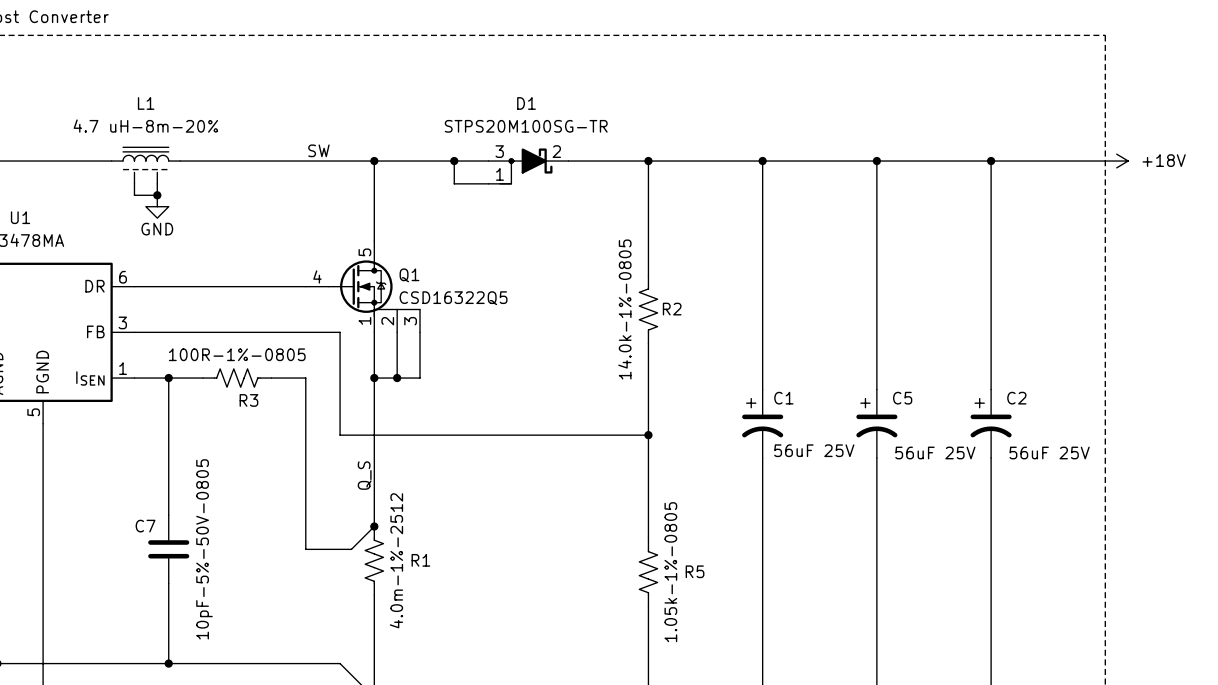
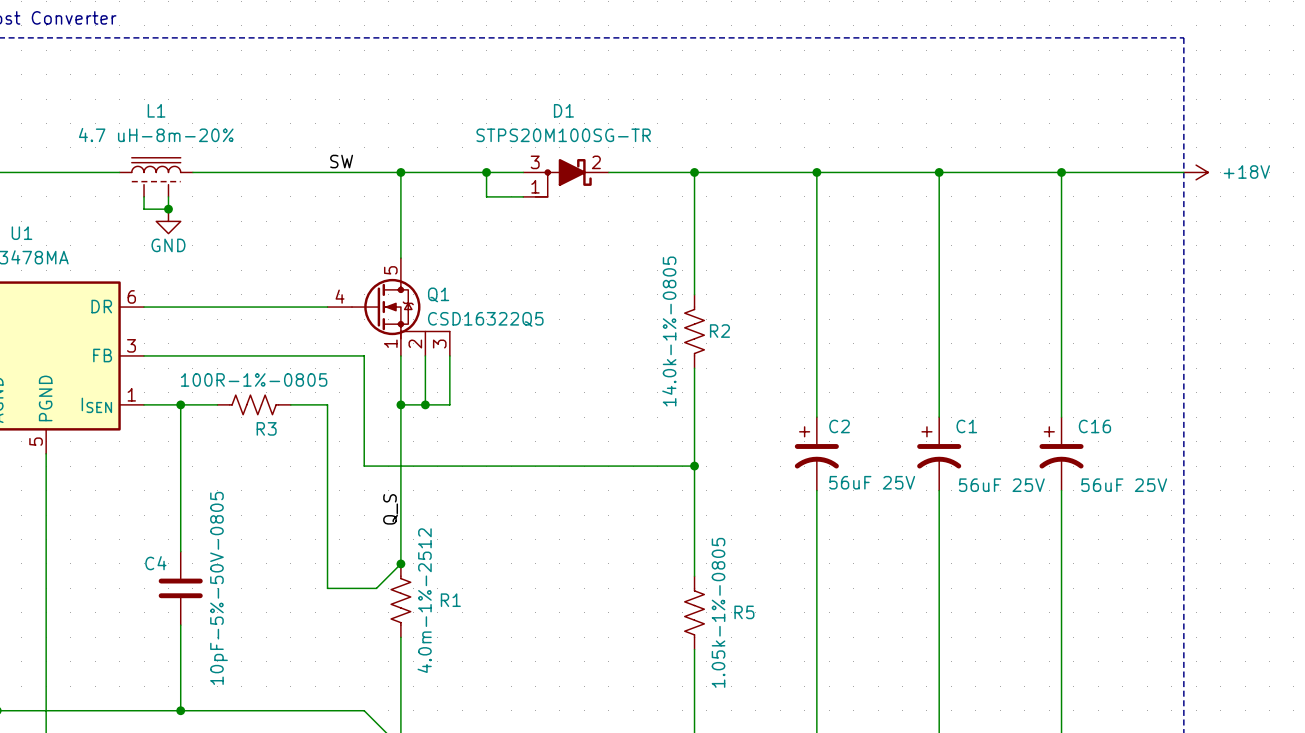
C1 name: C1 (783, 398) -> C2 (839, 426)
C5 name: C5 (902, 398) -> C1 (966, 426)
C2 name: C2 (1016, 398) -> C16 (1094, 426)
C7 name: C7 (145, 526) -> C4 (155, 563)

